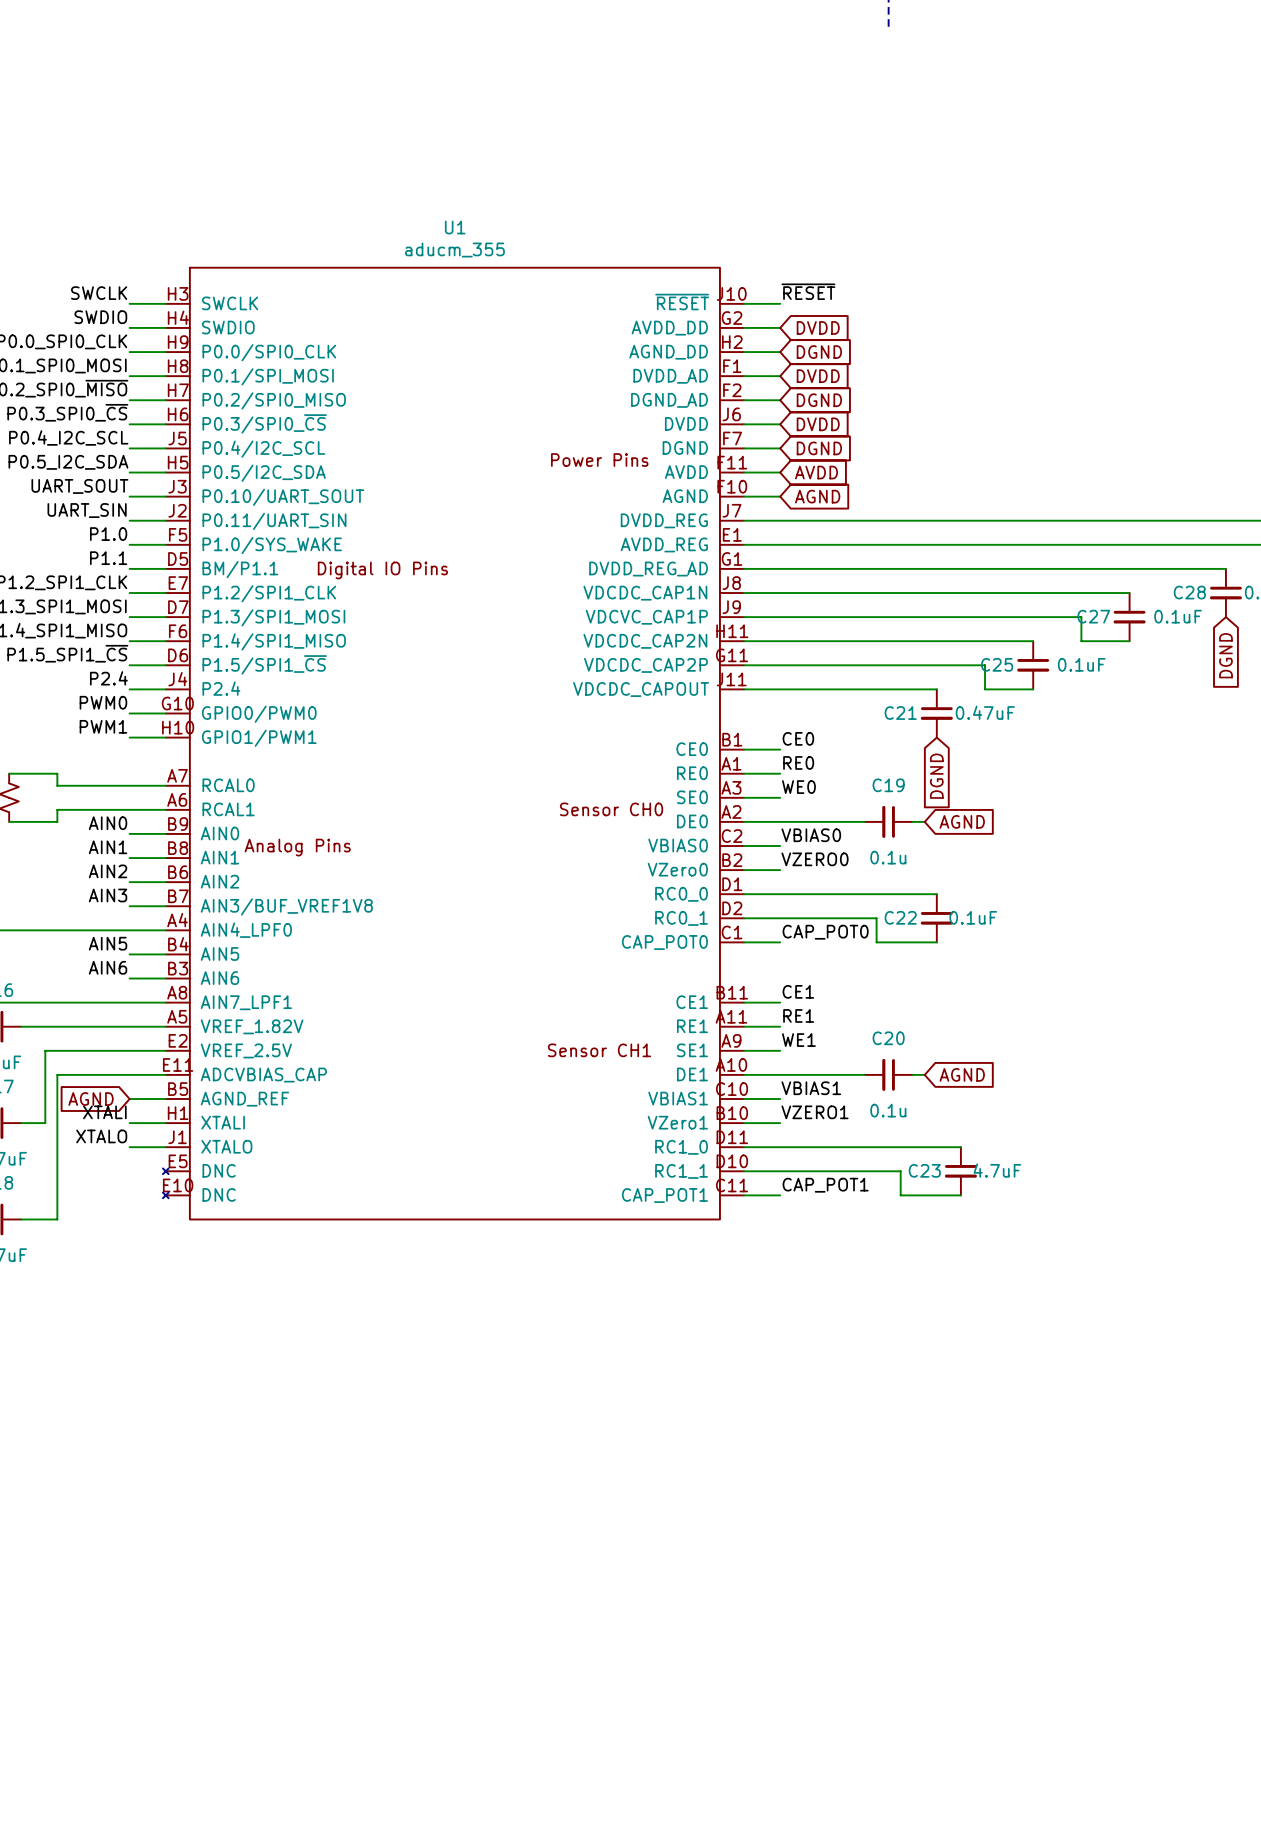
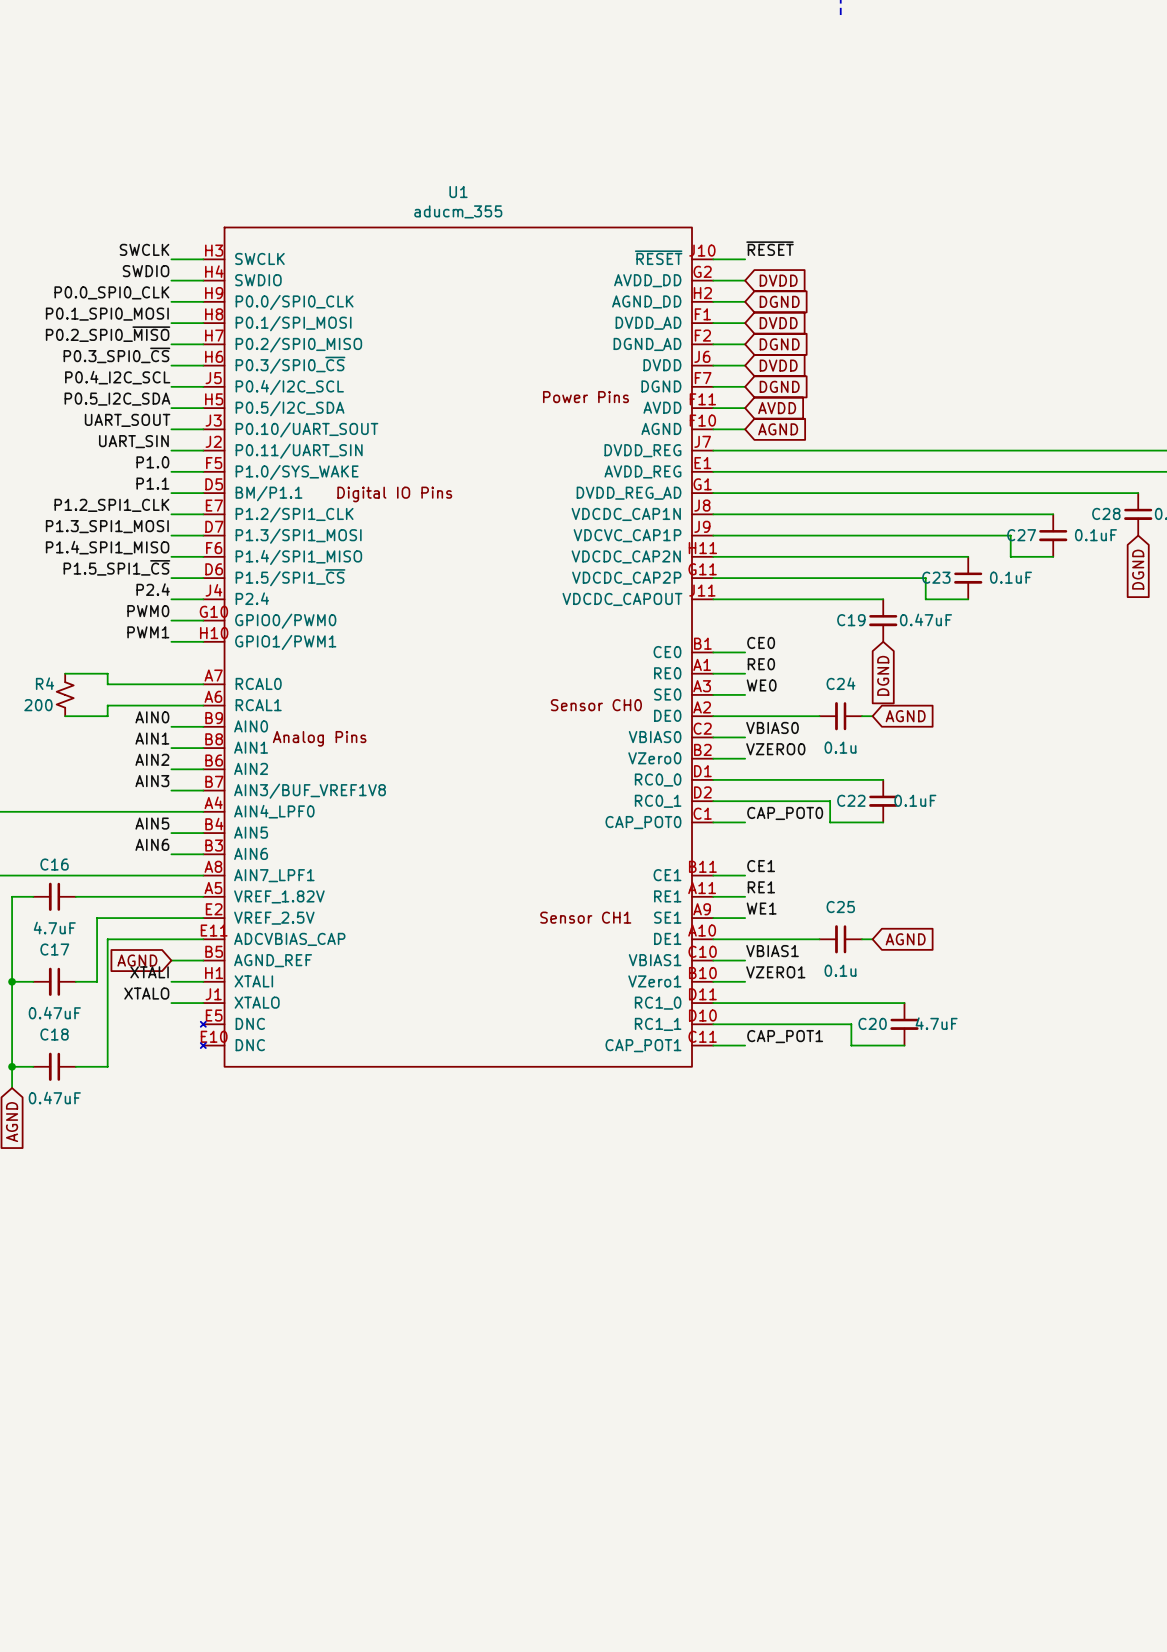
C25 name: C25 (997, 664) -> C23 (936, 577)
C21 name: C21 (900, 713) -> C19 (851, 620)
C19 name: C19 (888, 785) -> C24 (840, 683)
C20 name: C20 (888, 1038) -> C25 (840, 907)
C23 name: C23 (924, 1170) -> C20 (872, 1023)

